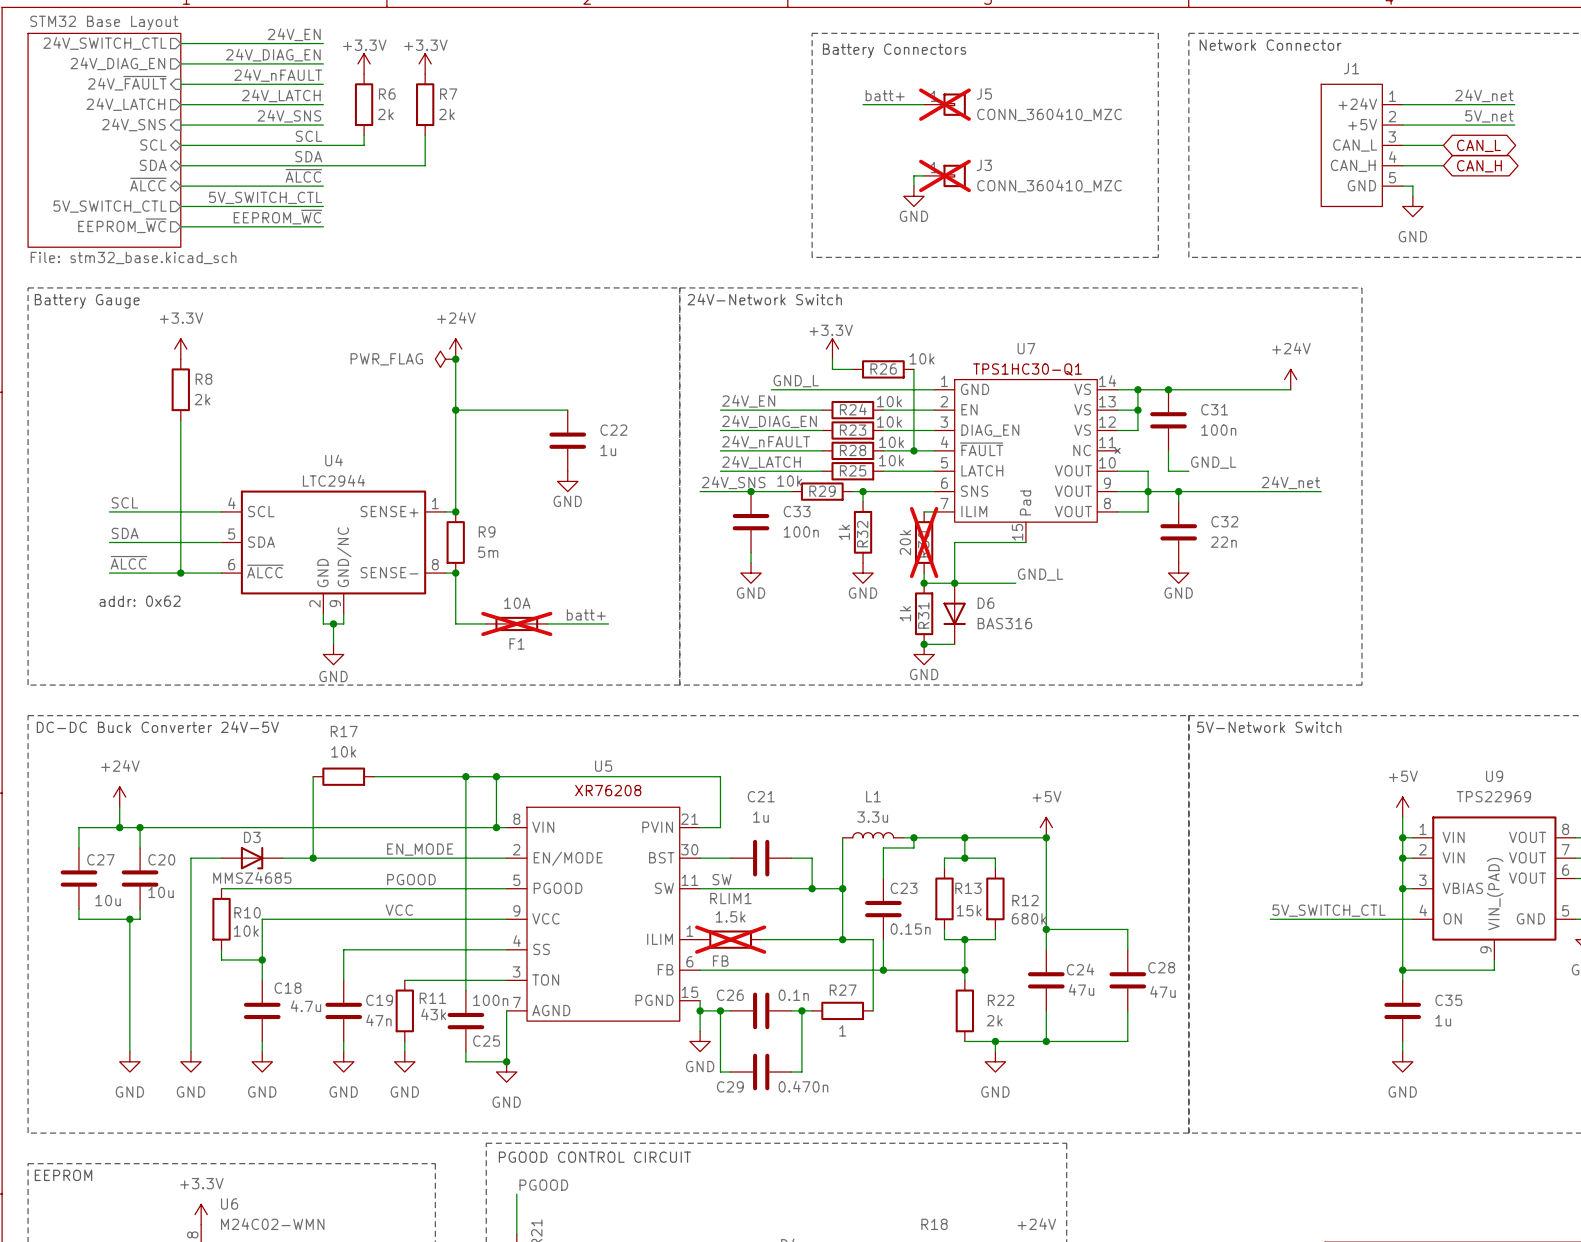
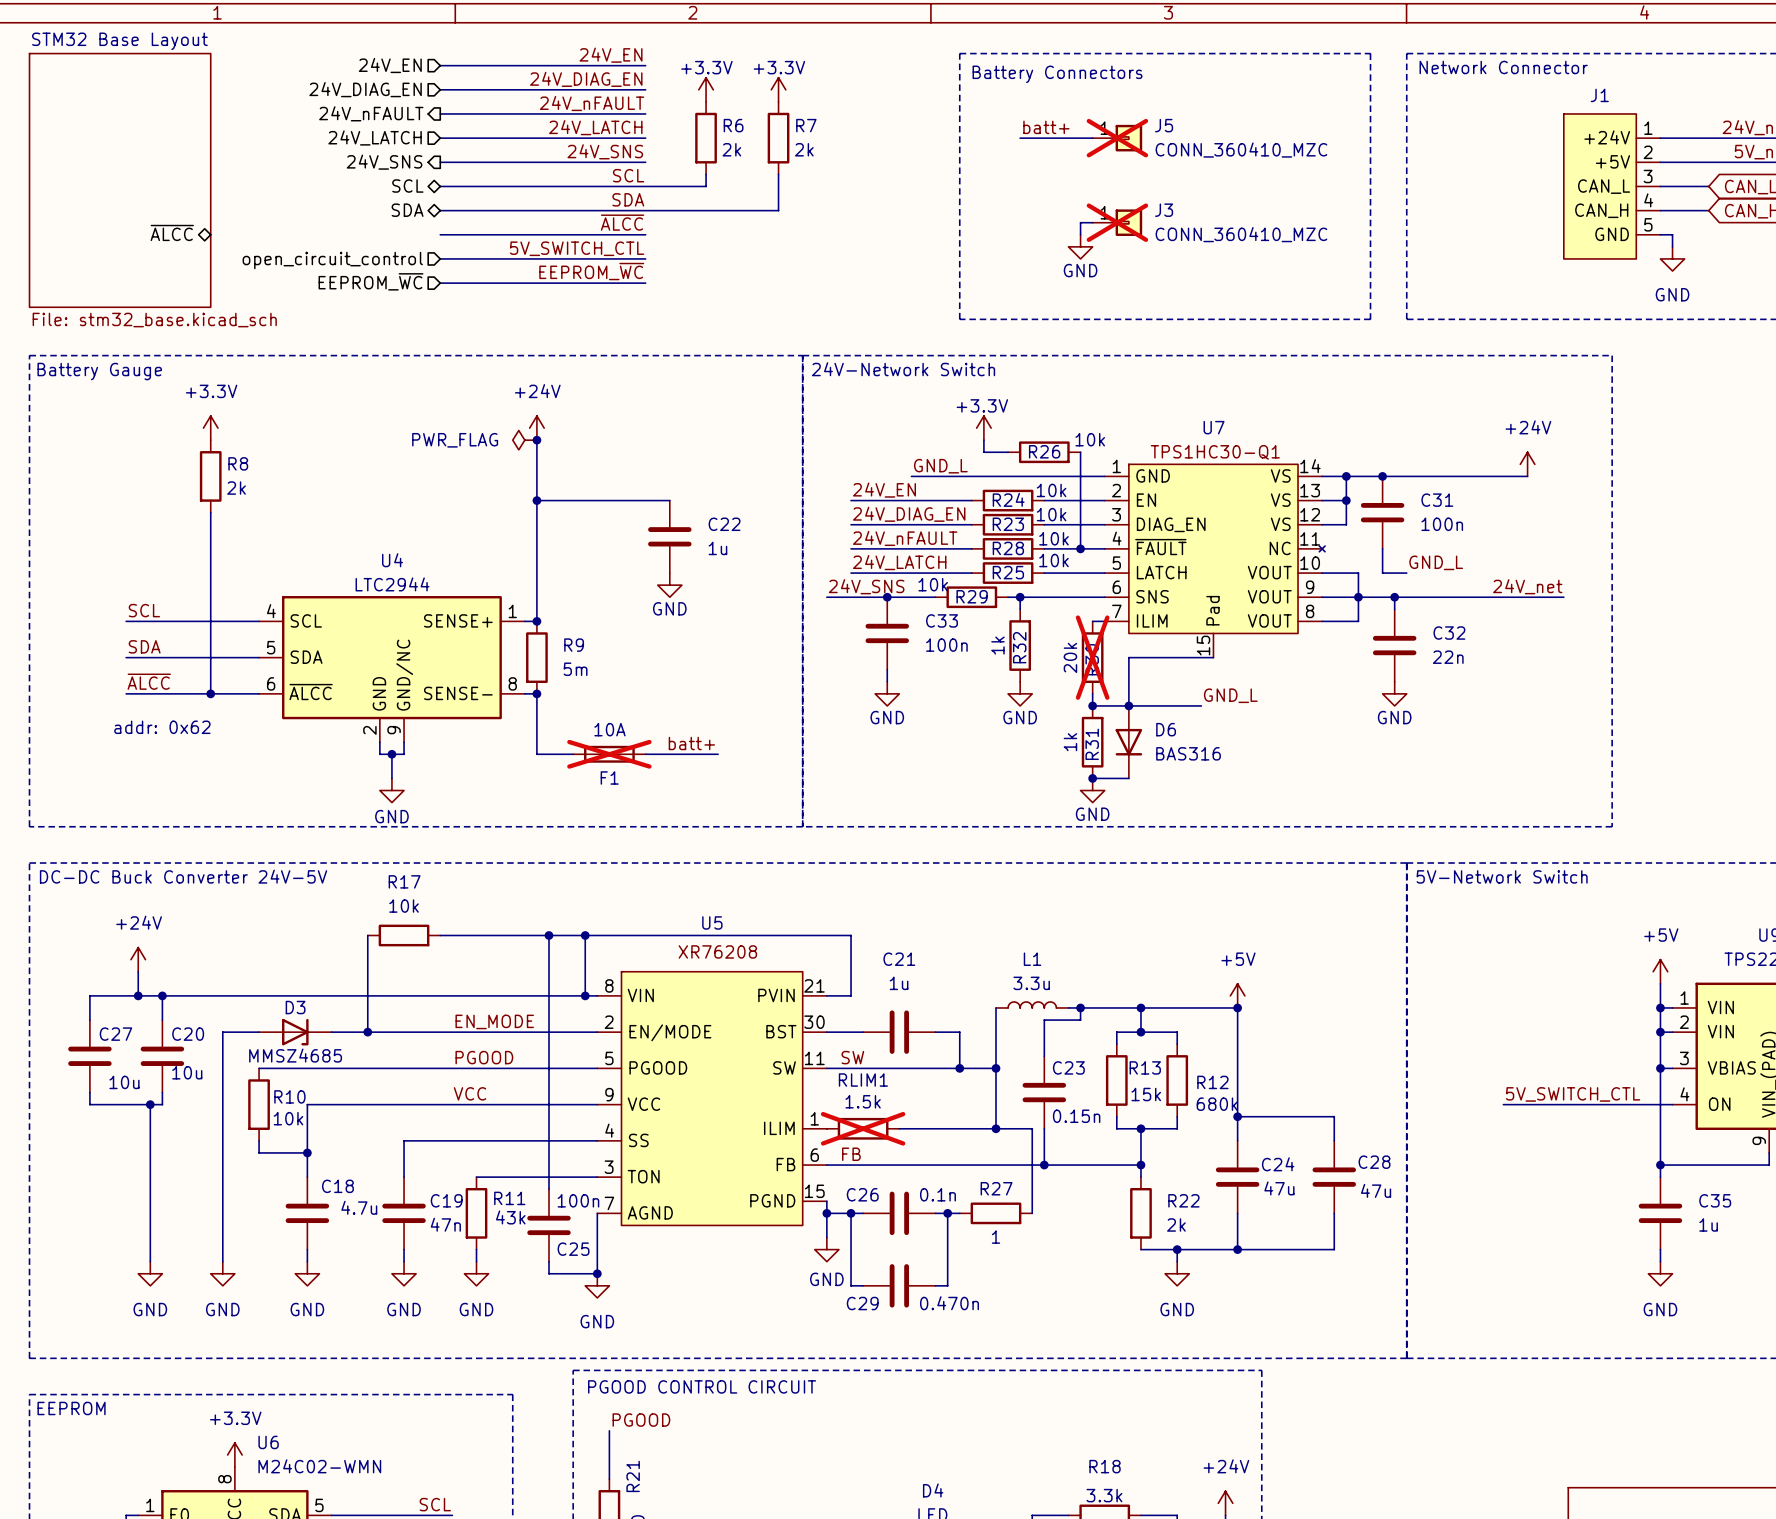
label: 24V_EN (294, 34) -> none
label: none -> 24V_EN (611, 55)
sheet pin: 24V_SWITCH_CTL (104, 43) -> none
wire: (180, 43) (323, 43) -> none
sheet pin: none -> 24V_EN (390, 65)
wire: none -> (440, 65) (645, 65)
label: 24V_DIAG_EN (273, 55) -> none
label: none -> 24V_DIAG_EN (586, 79)
sheet pin position: 24V_DIAG_EN (117, 63) -> 24V_DIAG_EN (365, 89)
wire: (180, 63) (323, 63) -> none
power symbol: +3.3V (364, 63) -> none
wire: none -> (440, 89) (645, 89)
power symbol: +3.3V (425, 63) -> none
power symbol: none -> +3.3V (706, 89)
power symbol: none -> +3.3V (778, 89)
label: 24V_nFAULT (278, 75) -> none
label: none -> 24V_nFAULT (592, 103)
sheet pin: 24V_~{FAULT} (127, 83) -> none
wire: (180, 84) (323, 84) -> none
sheet pin: none -> 24V_nFAULT (371, 113)
wire: none -> (440, 113) (645, 113)
label: 24V_LATCH (281, 95) -> none
label: none -> 24V_LATCH (595, 127)
sheet pin position: 24V_LATCH (125, 104) -> 24V_LATCH (375, 137)
wire: (180, 104) (323, 104) -> none
R6 position: (364, 104) -> (706, 138)
wire: none -> (440, 138) (645, 138)
R7 position: (425, 104) -> (778, 138)
label: 24V_SNS (289, 116) -> none
label: none -> 24V_SNS (605, 151)
sheet pin position: 24V_SNS (133, 124) -> 24V_SNS (384, 162)
wire: (180, 125) (323, 125) -> none
wire: none -> (440, 162) (645, 162)
wire: (364, 135) (364, 145) (180, 145) -> none
wire: (425, 135) (425, 165) -> (778, 174) (778, 210) (500, 210)
wire: none -> (706, 174) (706, 186) (440, 186)
label: SCL (308, 136) -> none
label: none -> SCL (628, 175)
sheet pin position: SCL (153, 145) -> SCL (407, 186)
label: SDA (308, 156) -> none
label: none -> SDA (628, 199)
sheet pin position: SDA (153, 165) -> SDA (407, 210)
wire: (180, 165) (374, 165) -> none
label: ~{ALCC} (303, 175) -> none
label: none -> ~{ALCC} (622, 222)
wire: (180, 186) (323, 186) -> none
wire: none -> (440, 234) (645, 234)
label: 5V_SWITCH_CTL (265, 197) -> none
label: none -> 5V_SWITCH_CTL (577, 248)
sheet pin: 5V_SWITCH_CTL (110, 206) -> none
wire: (180, 206) (323, 206) -> none
wire: none -> (440, 258) (645, 258)
sheet pin: none -> open_circuit_control (332, 260)
label: EEPROM_~{WC} (277, 217) -> none
label: none -> EEPROM_~{WC} (591, 271)
sheet pin position: EEPROM_~{WC} (122, 225) -> EEPROM_~{WC} (371, 281)
wire: (180, 226) (323, 226) -> none
wire: none -> (440, 283) (645, 283)

